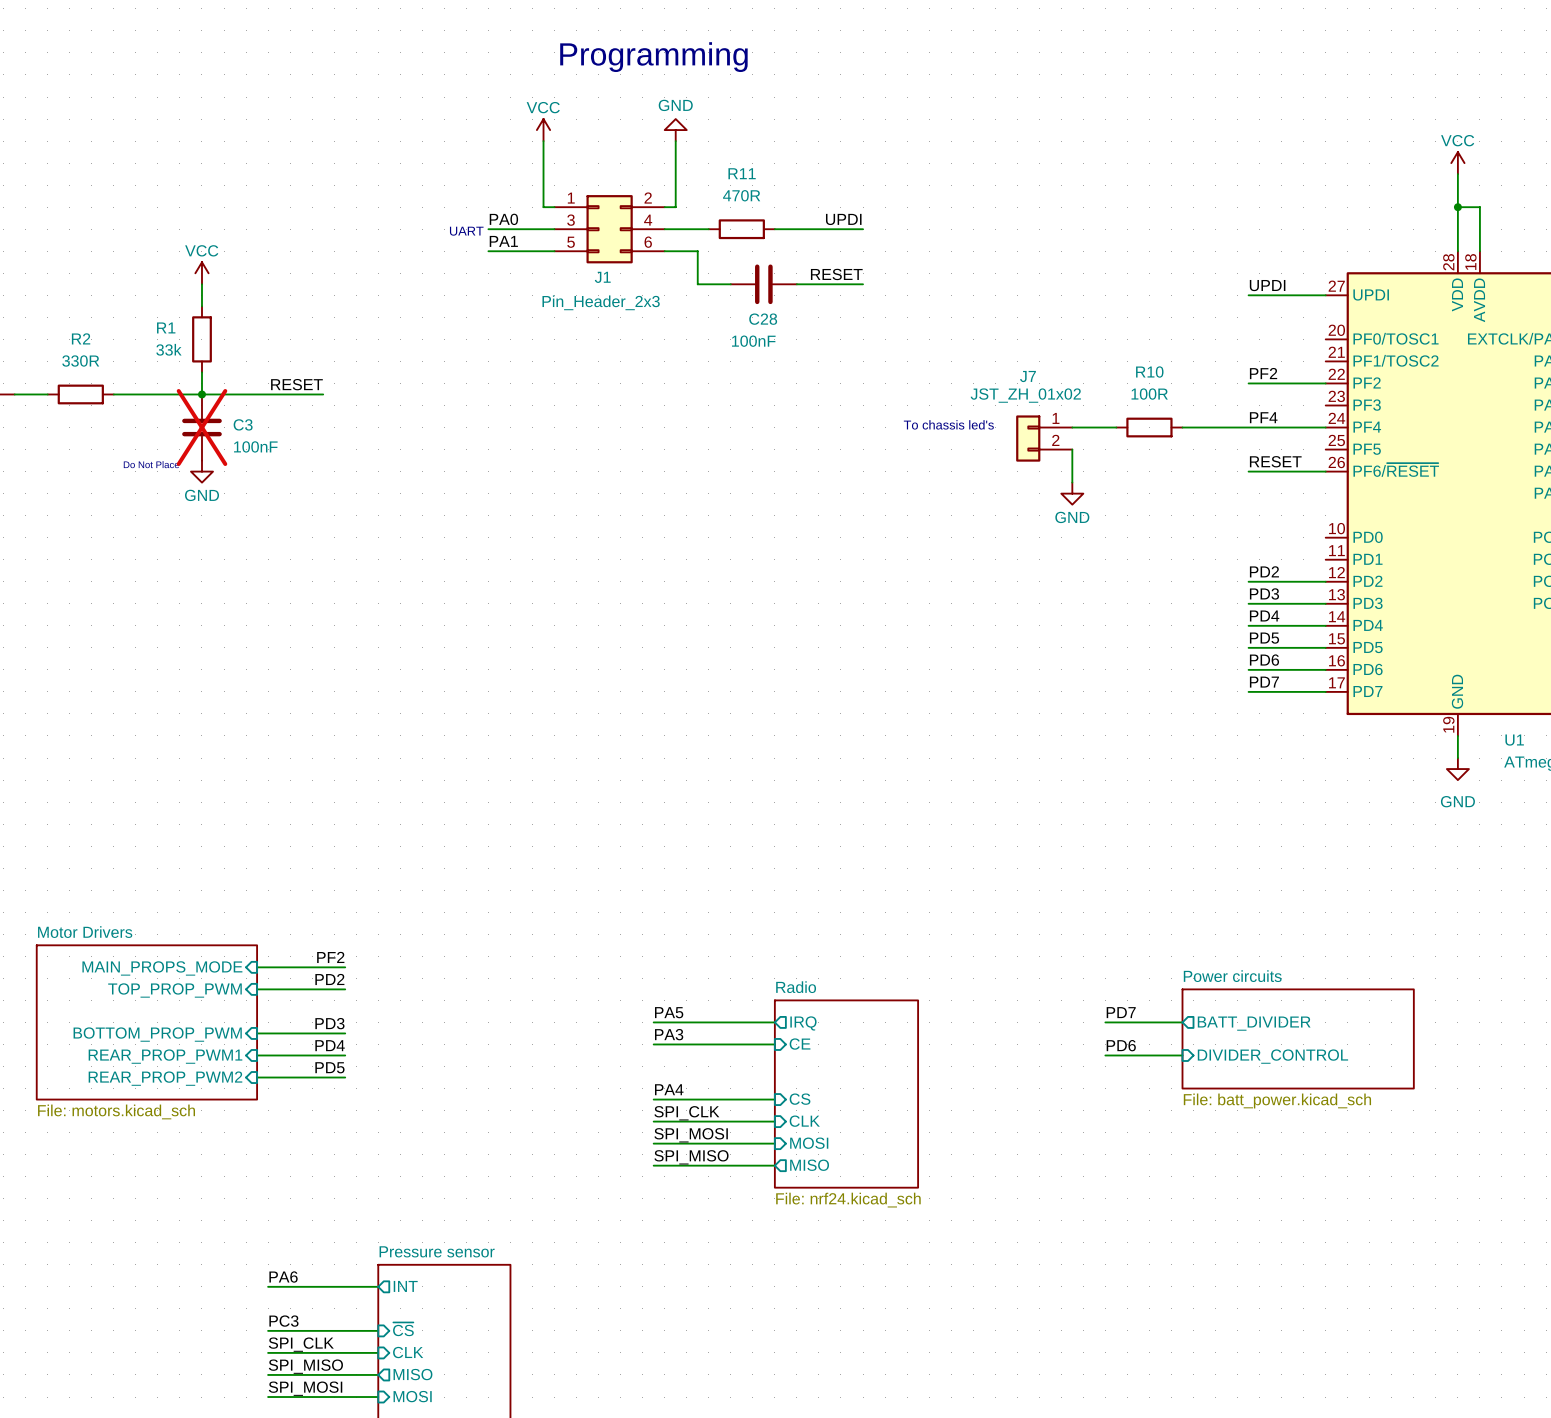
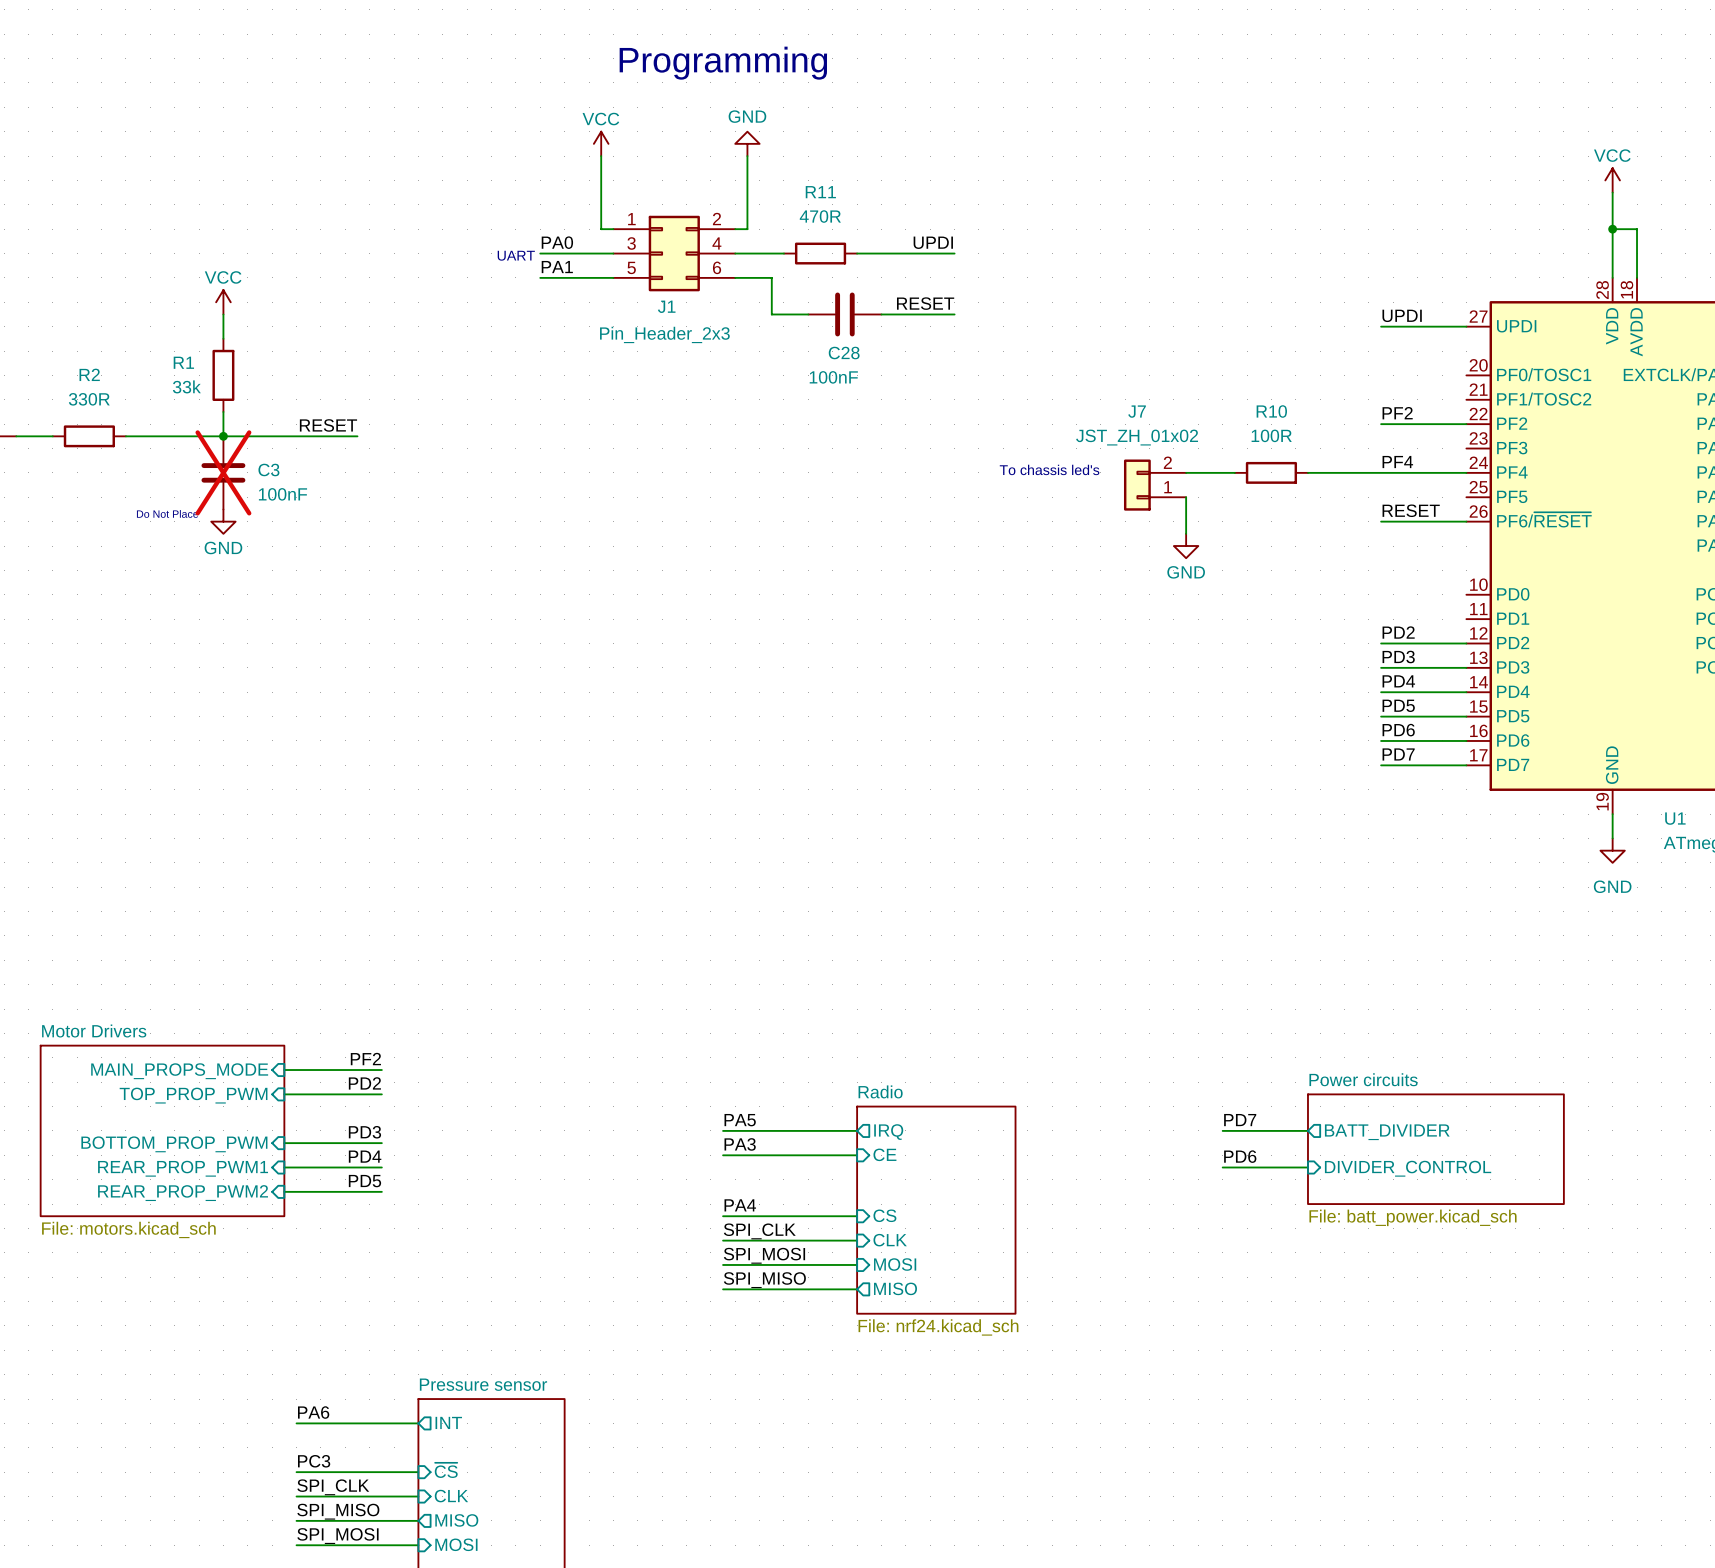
J7 flip: as is (1028, 438) -> up-down (1137, 485)

